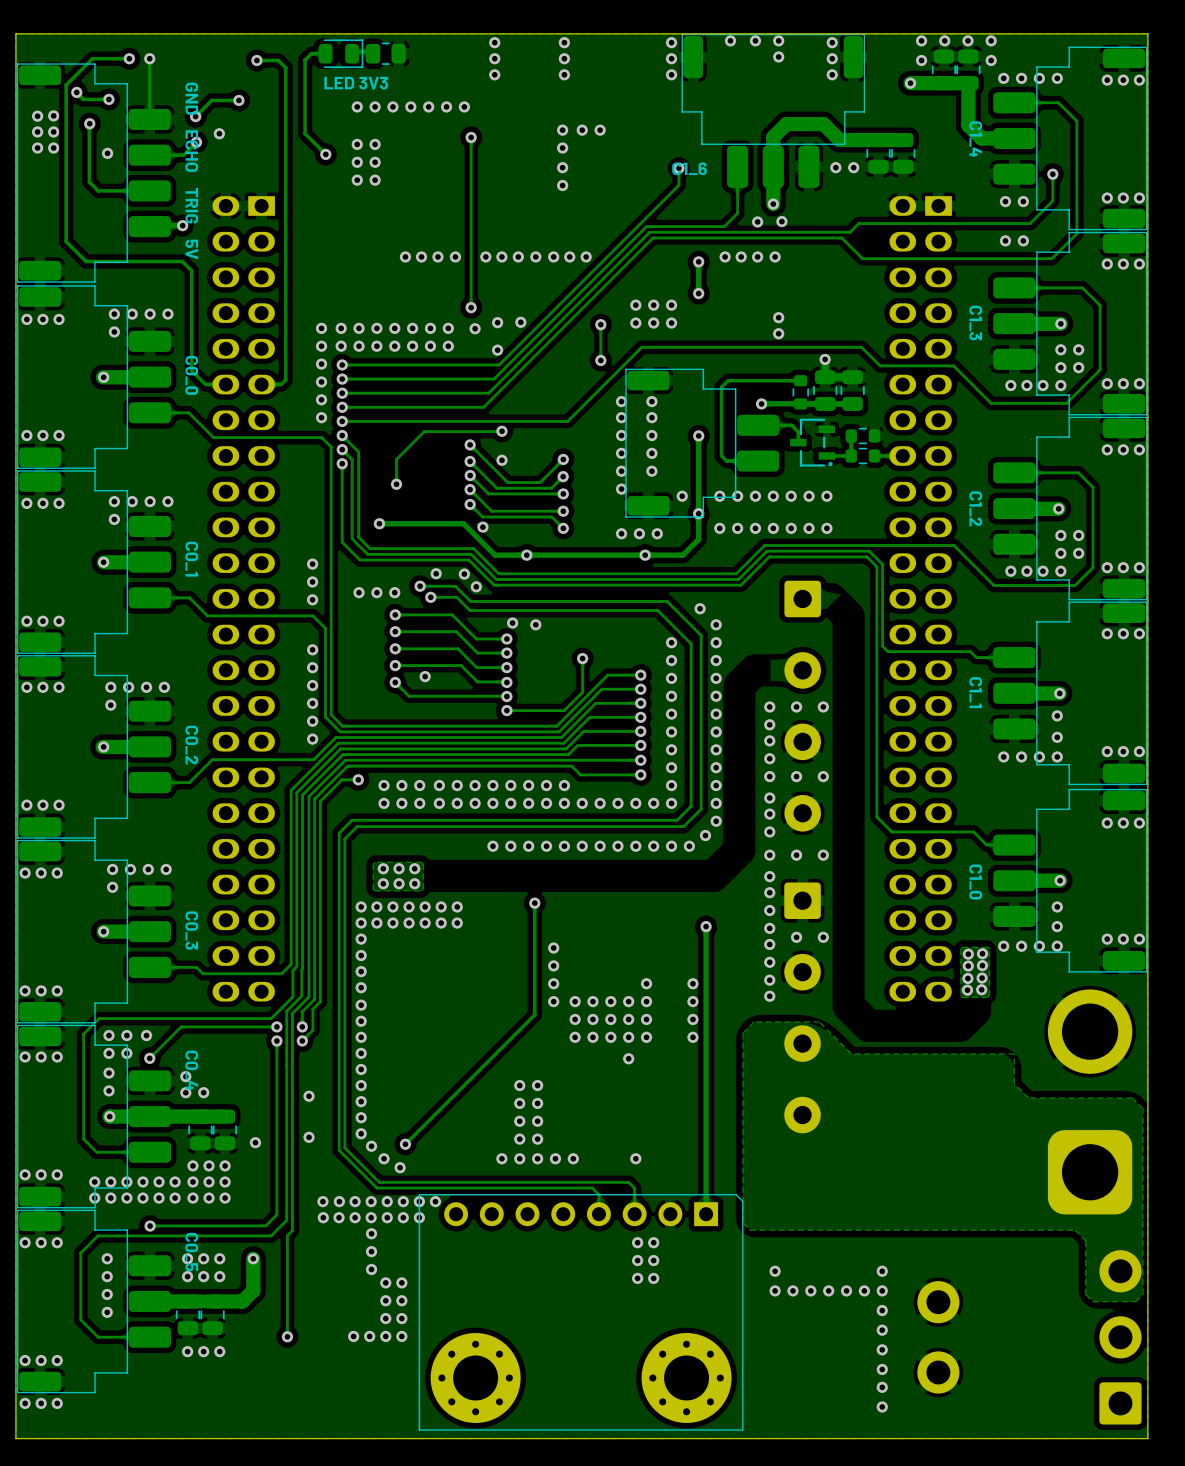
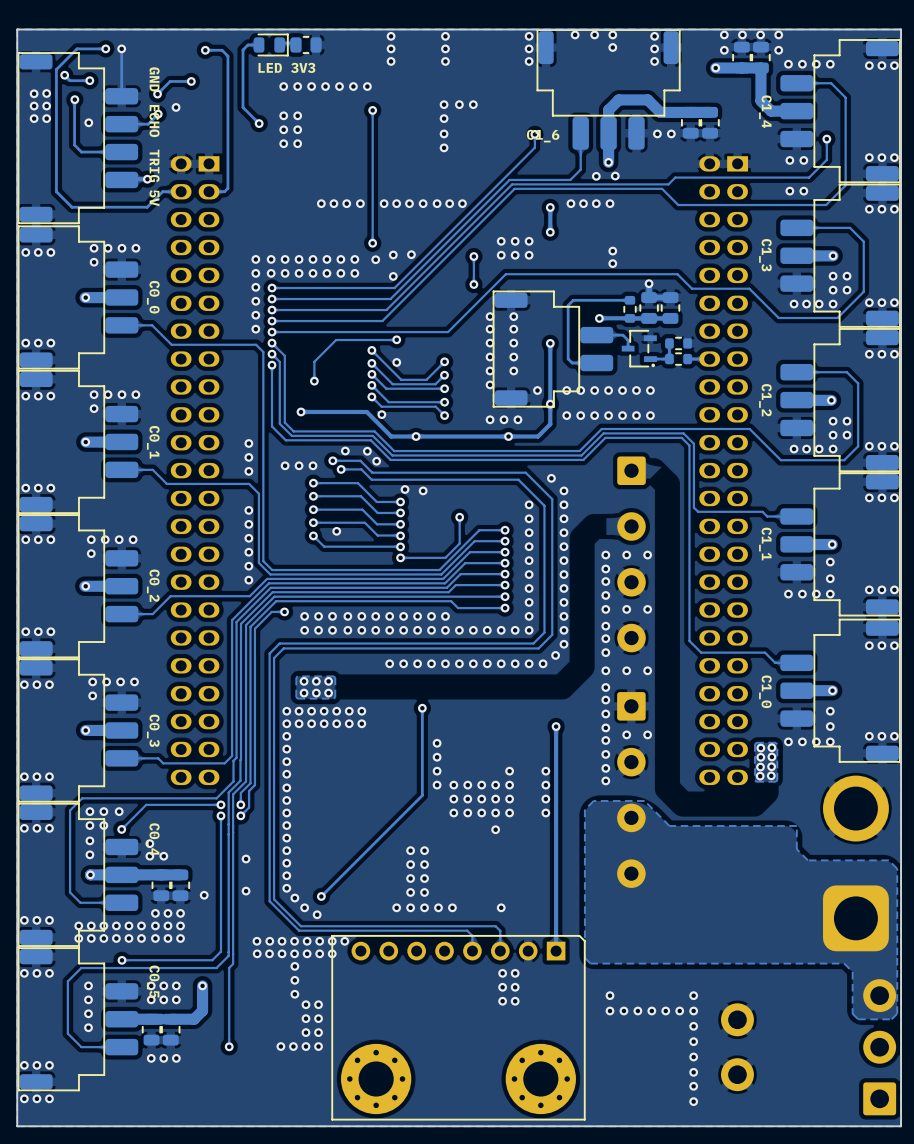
track: (285, 237) (285, 379) (281, 384) (261, 384) -> (227, 188) (224, 191) (209, 191)
track: (182, 261) (191, 270) (191, 370) (205, 384) (225, 384) -> (147, 207) (162, 191) (181, 191)

